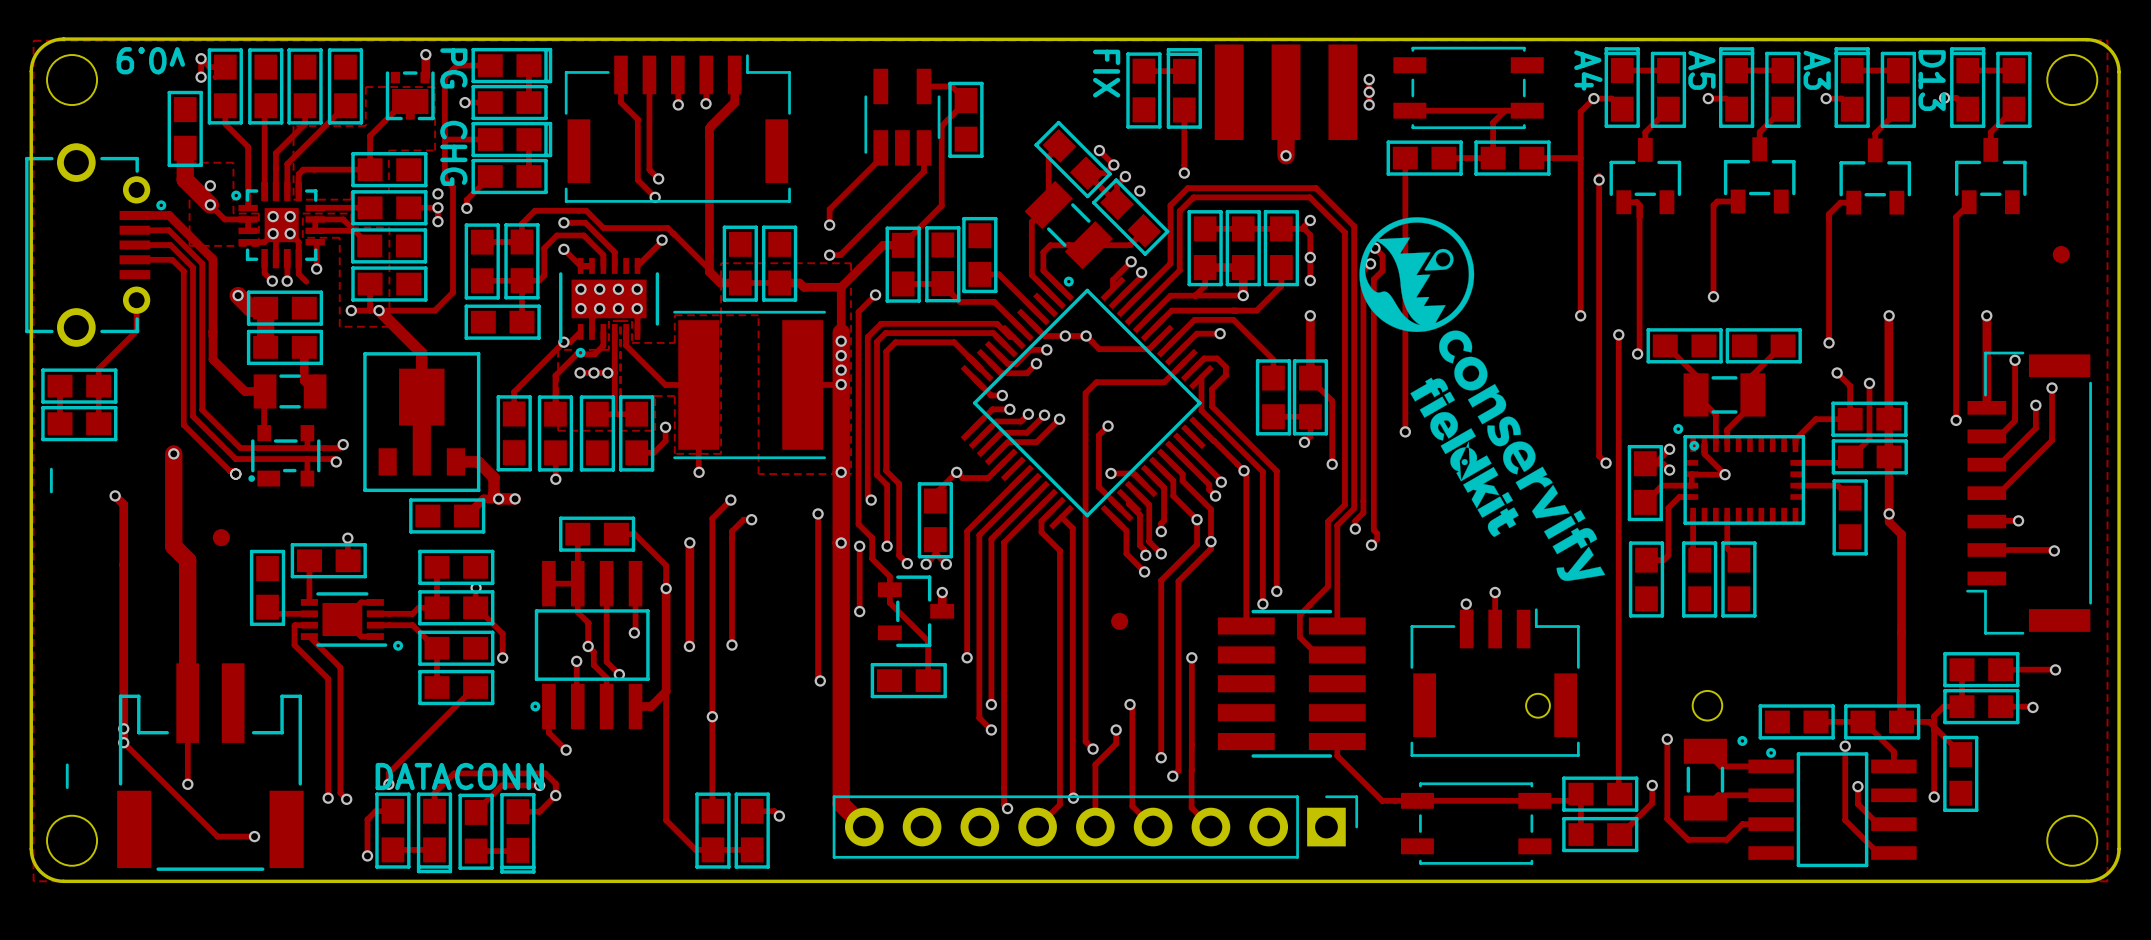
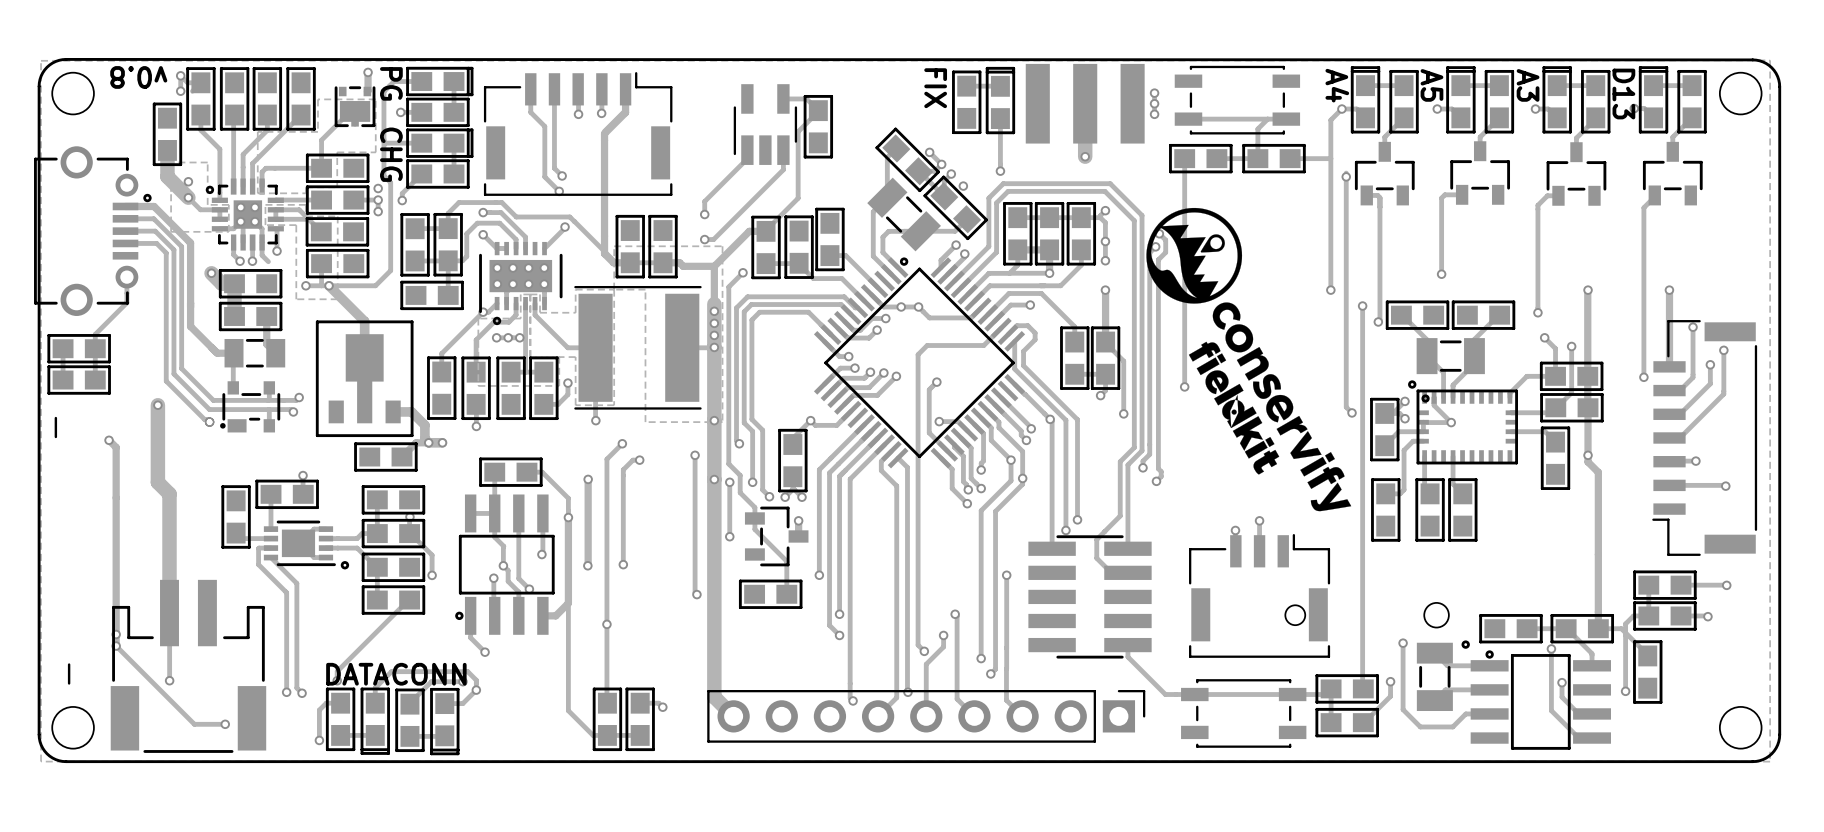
text: v0.9 (150, 60) -> v0.8 (138, 77)
part: (2061, 254) -> none
part: (221, 537) -> none
part: (1119, 621) -> none

